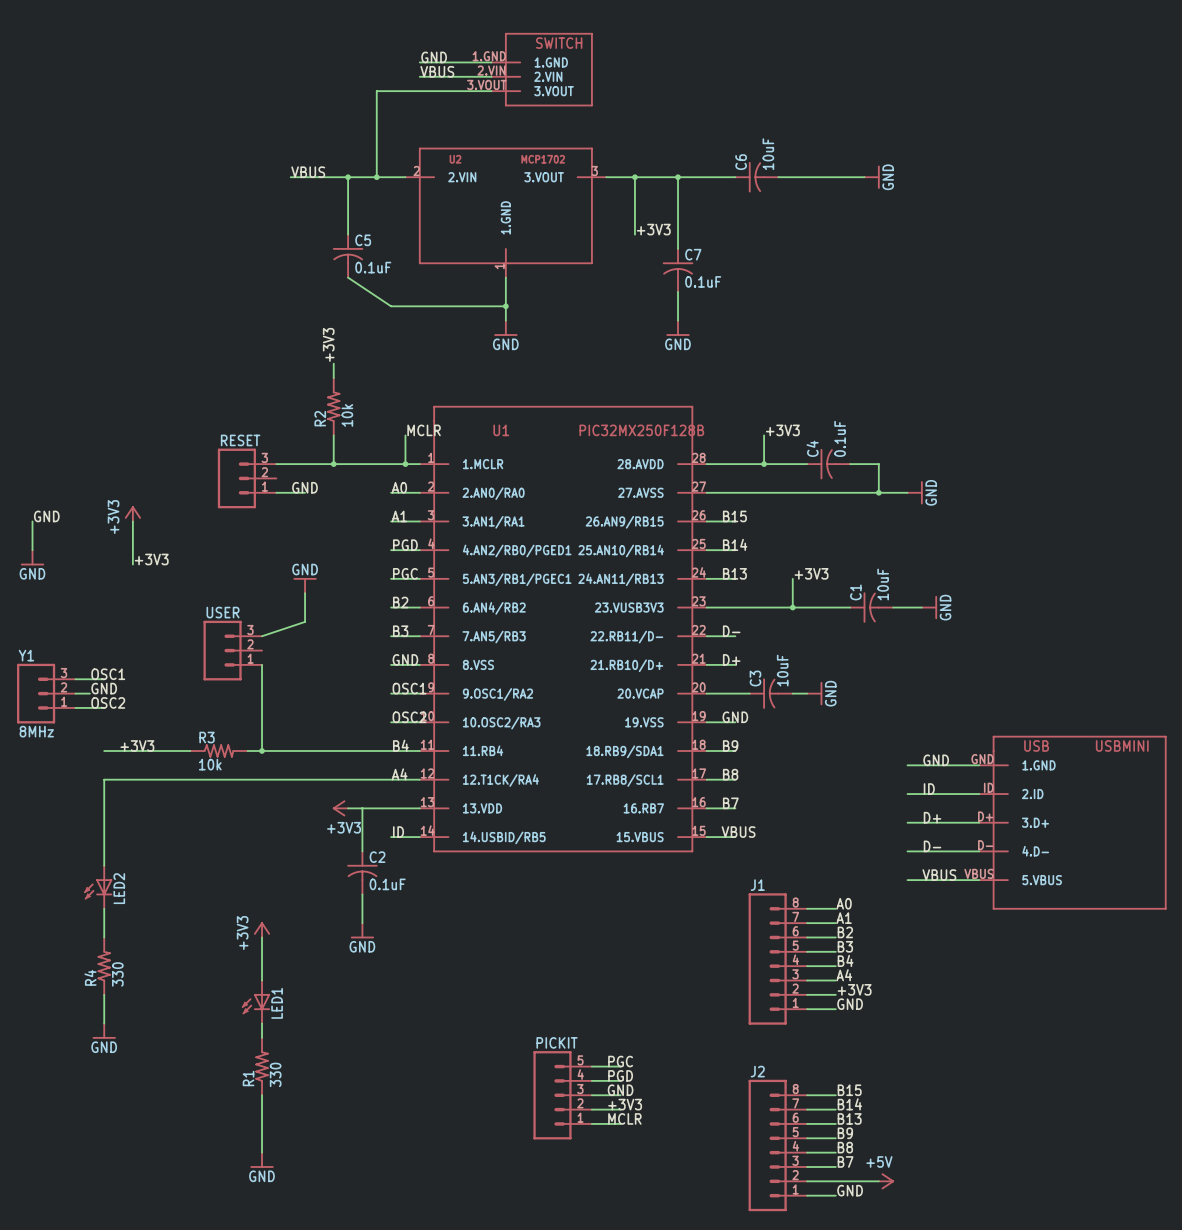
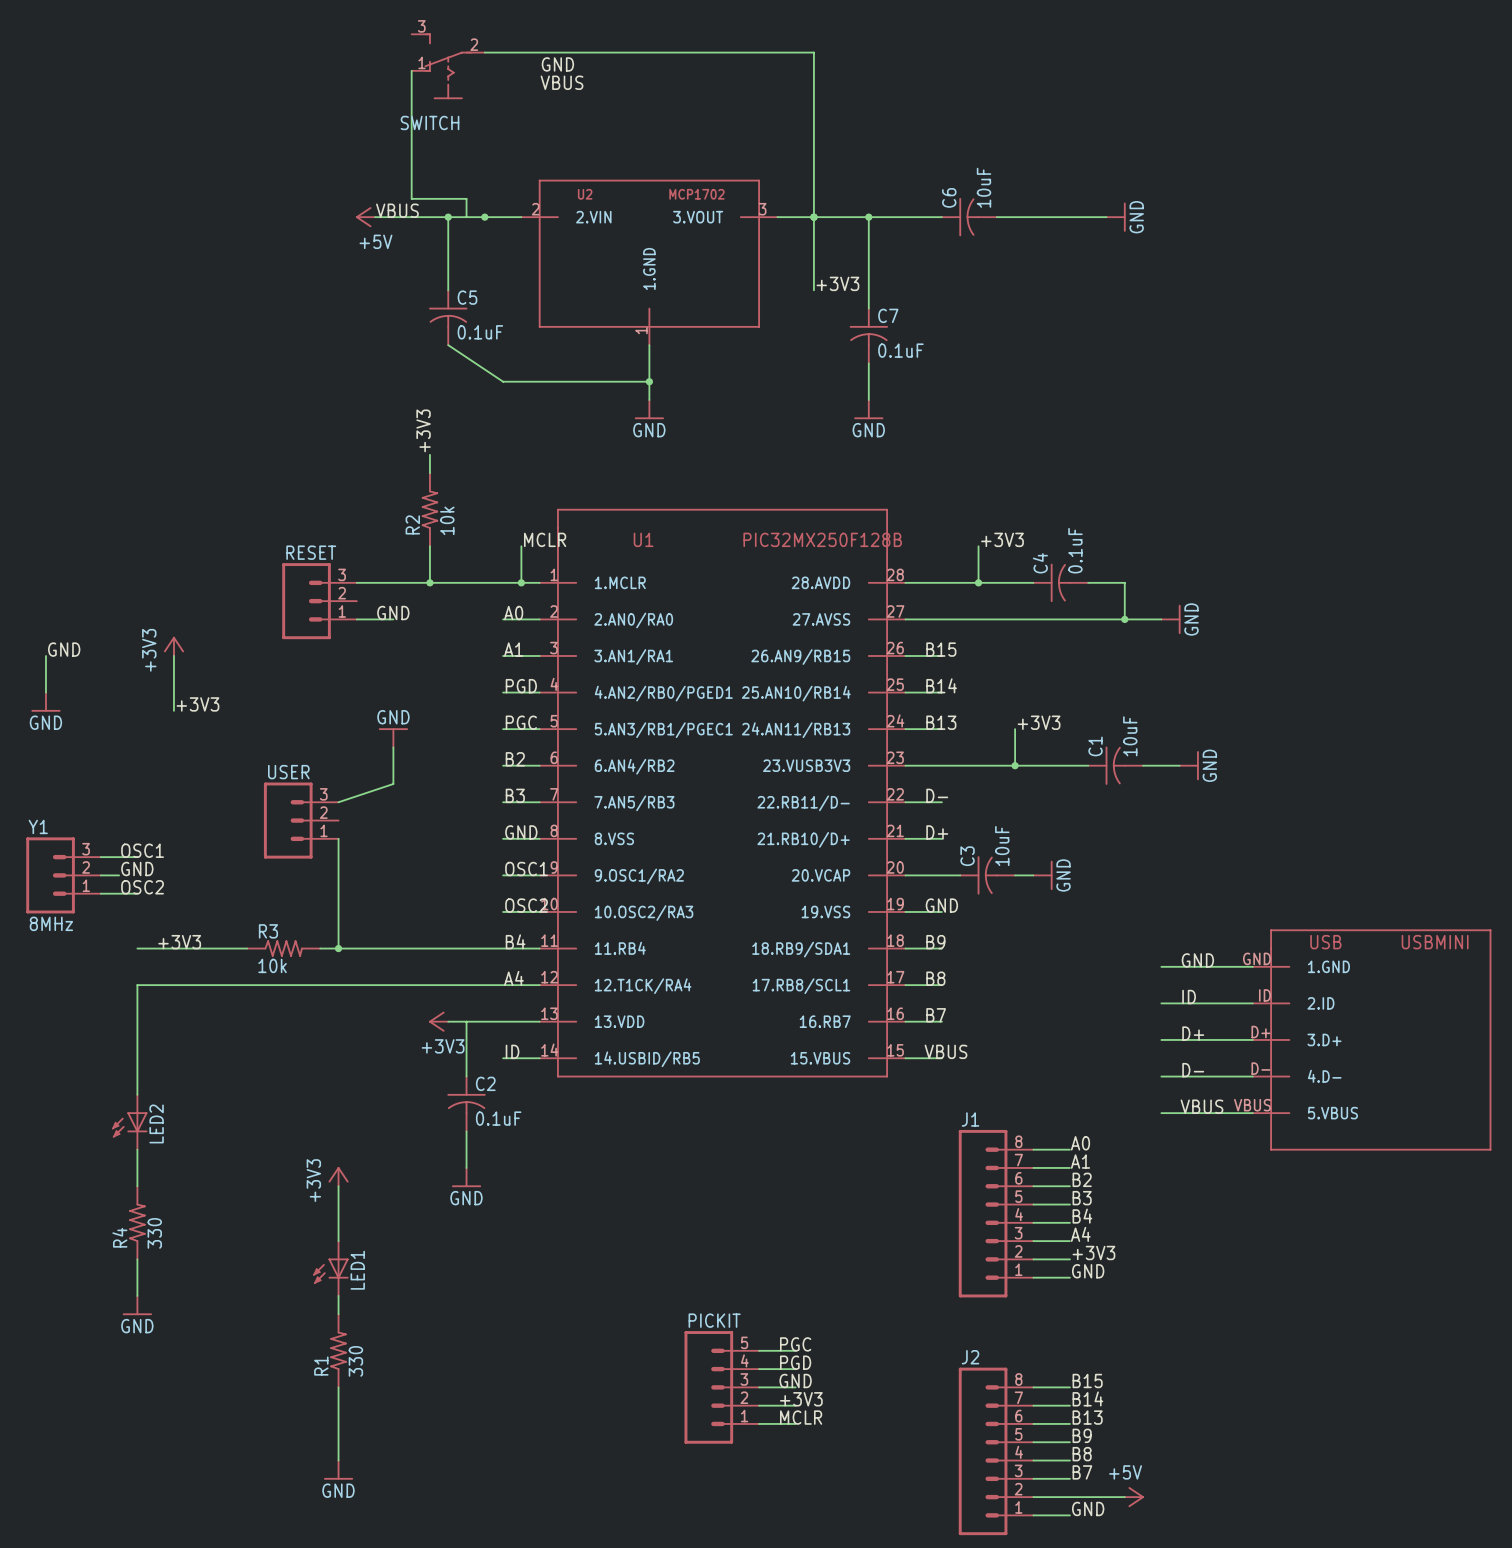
wire: none -> (484, 52) (813, 52) (813, 217)
SWITCH: none -> (448, 66)
wire: none -> (411, 70) (411, 198) (466, 198) (466, 217)
wire: (419, 62) (491, 62) -> none
SWITCH: (542, 69) -> none
wire: (419, 76) (491, 76) -> none
wire: (491, 91) (376, 91) (376, 177) -> none
power symbol: none -> +5V (365, 217)

